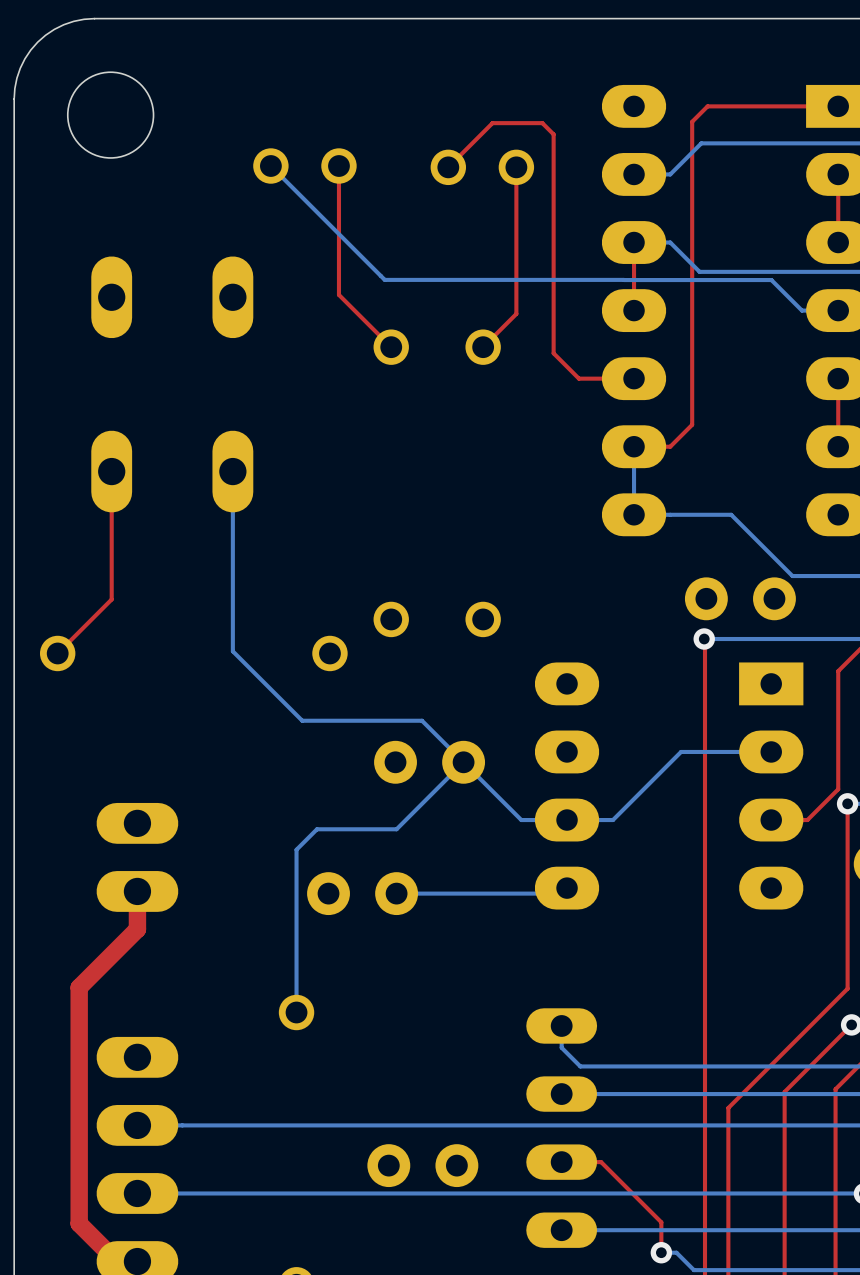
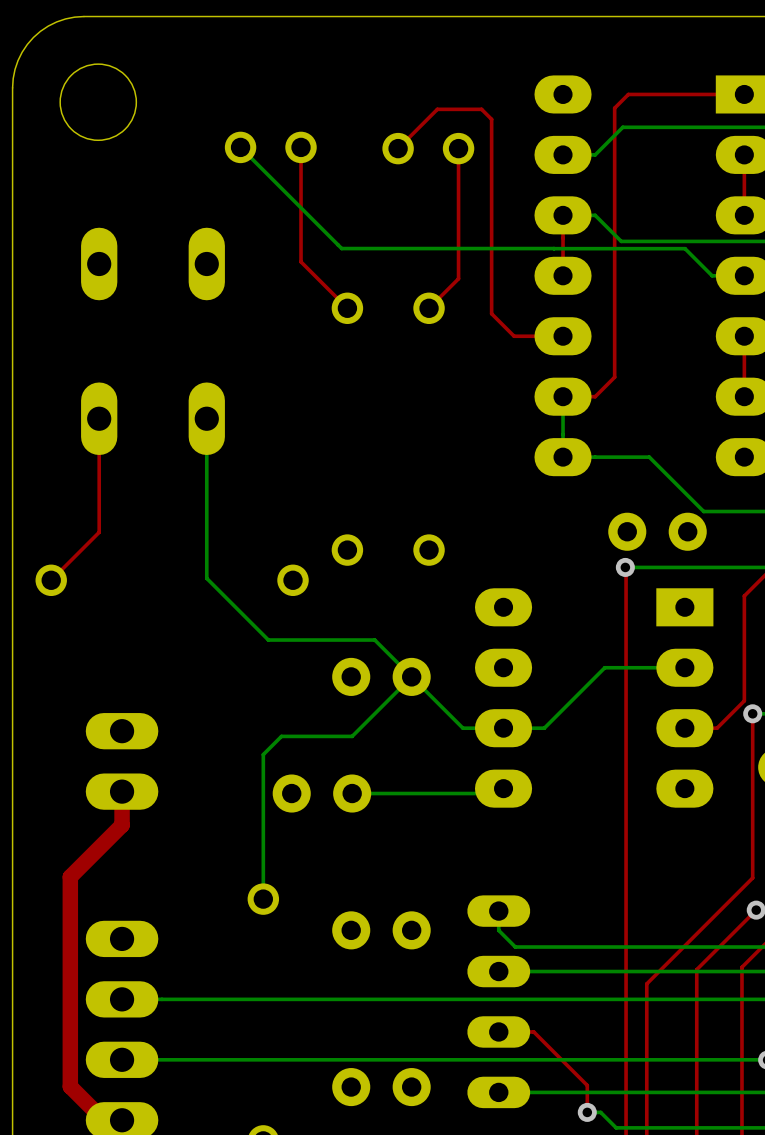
part: none -> (381, 930)
part: (422, 1165) -> none
part: none -> (381, 1087)

